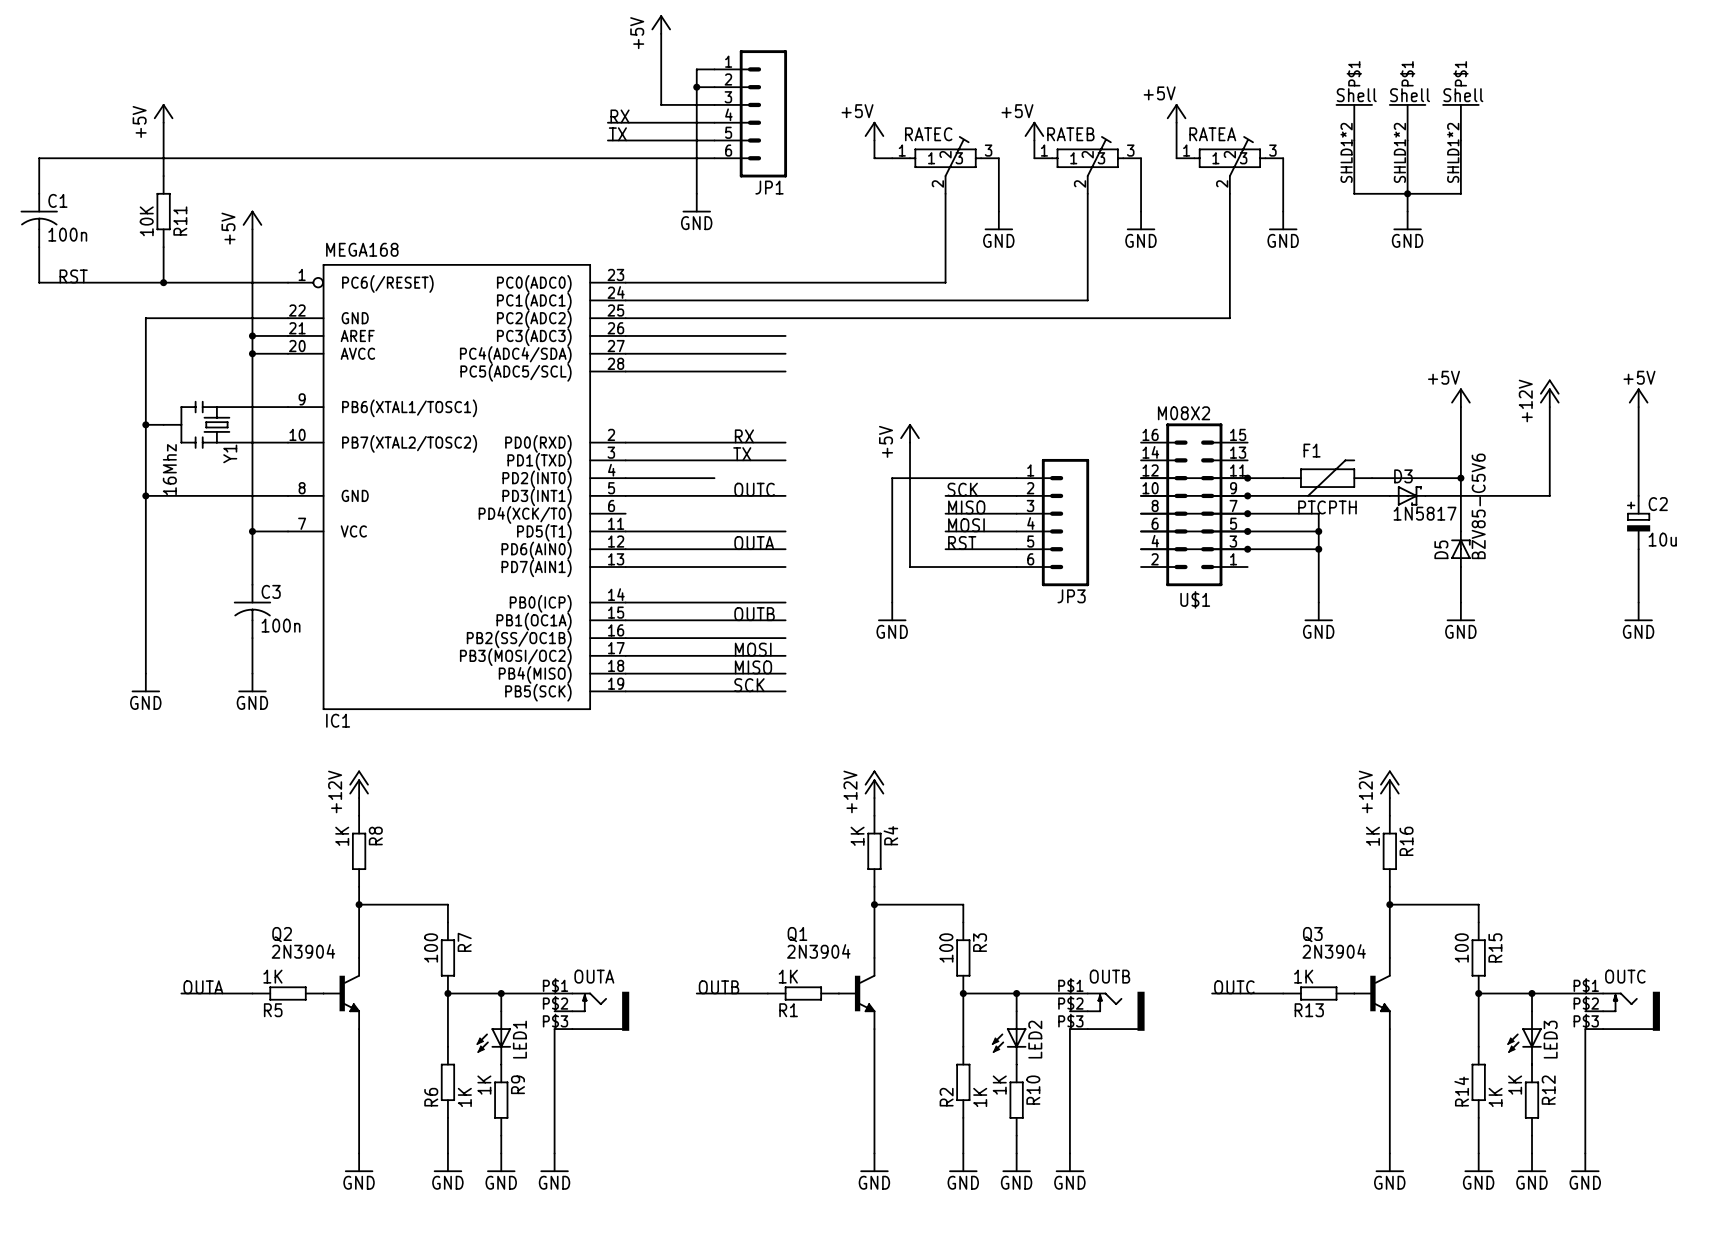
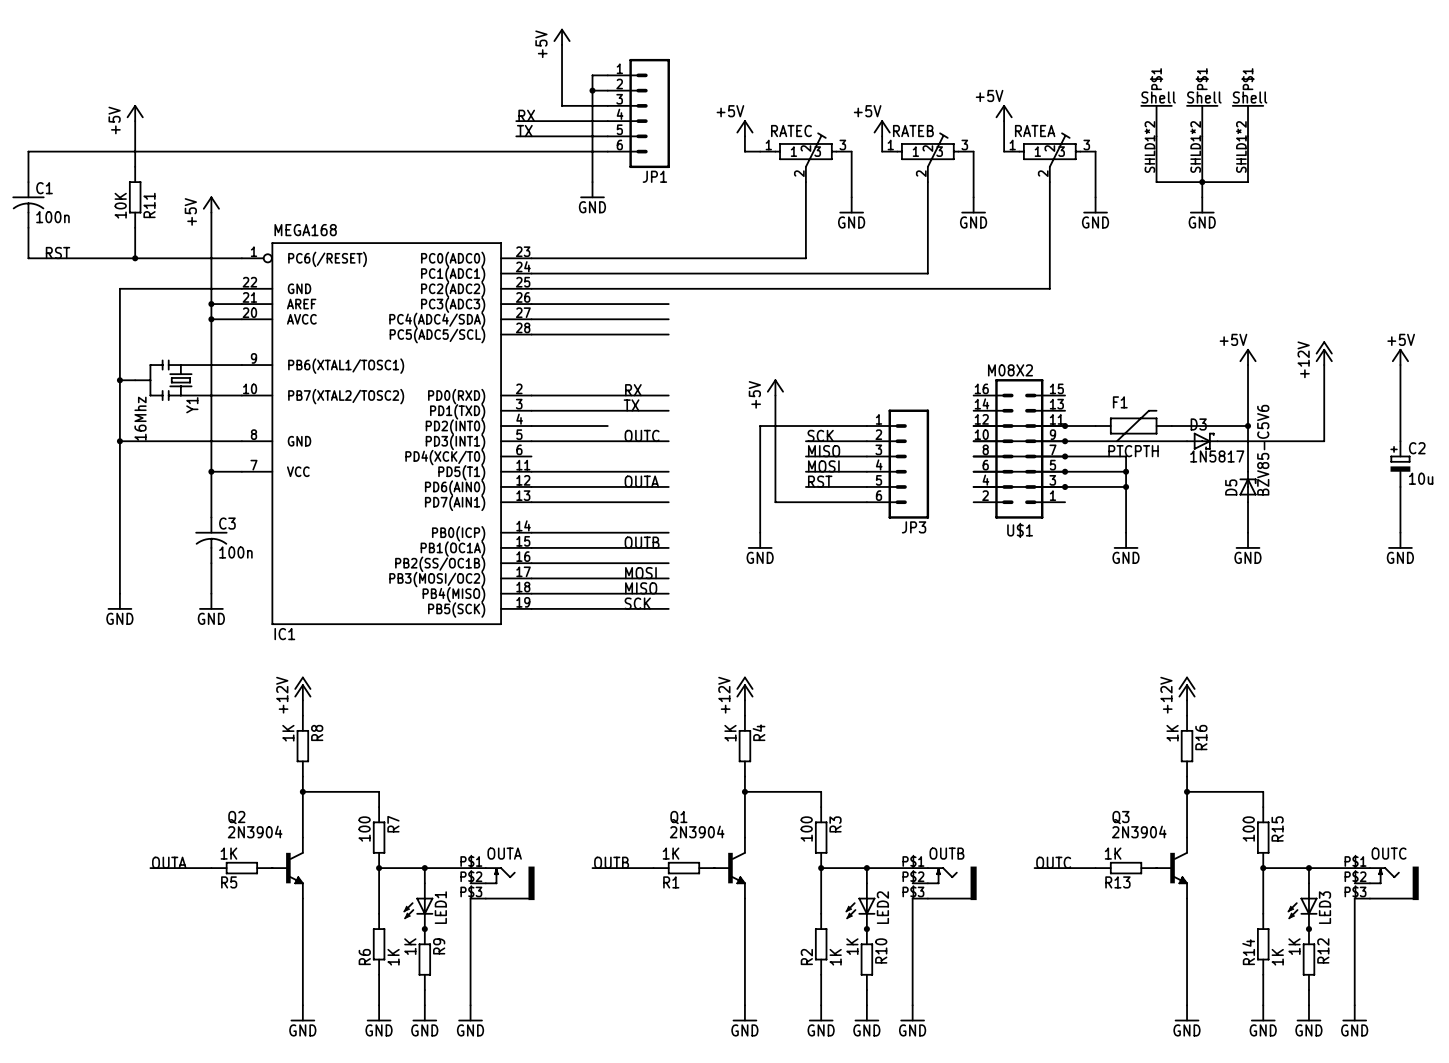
junction: none -> (424, 929)
junction: none -> (866, 929)
junction: none -> (1308, 929)

